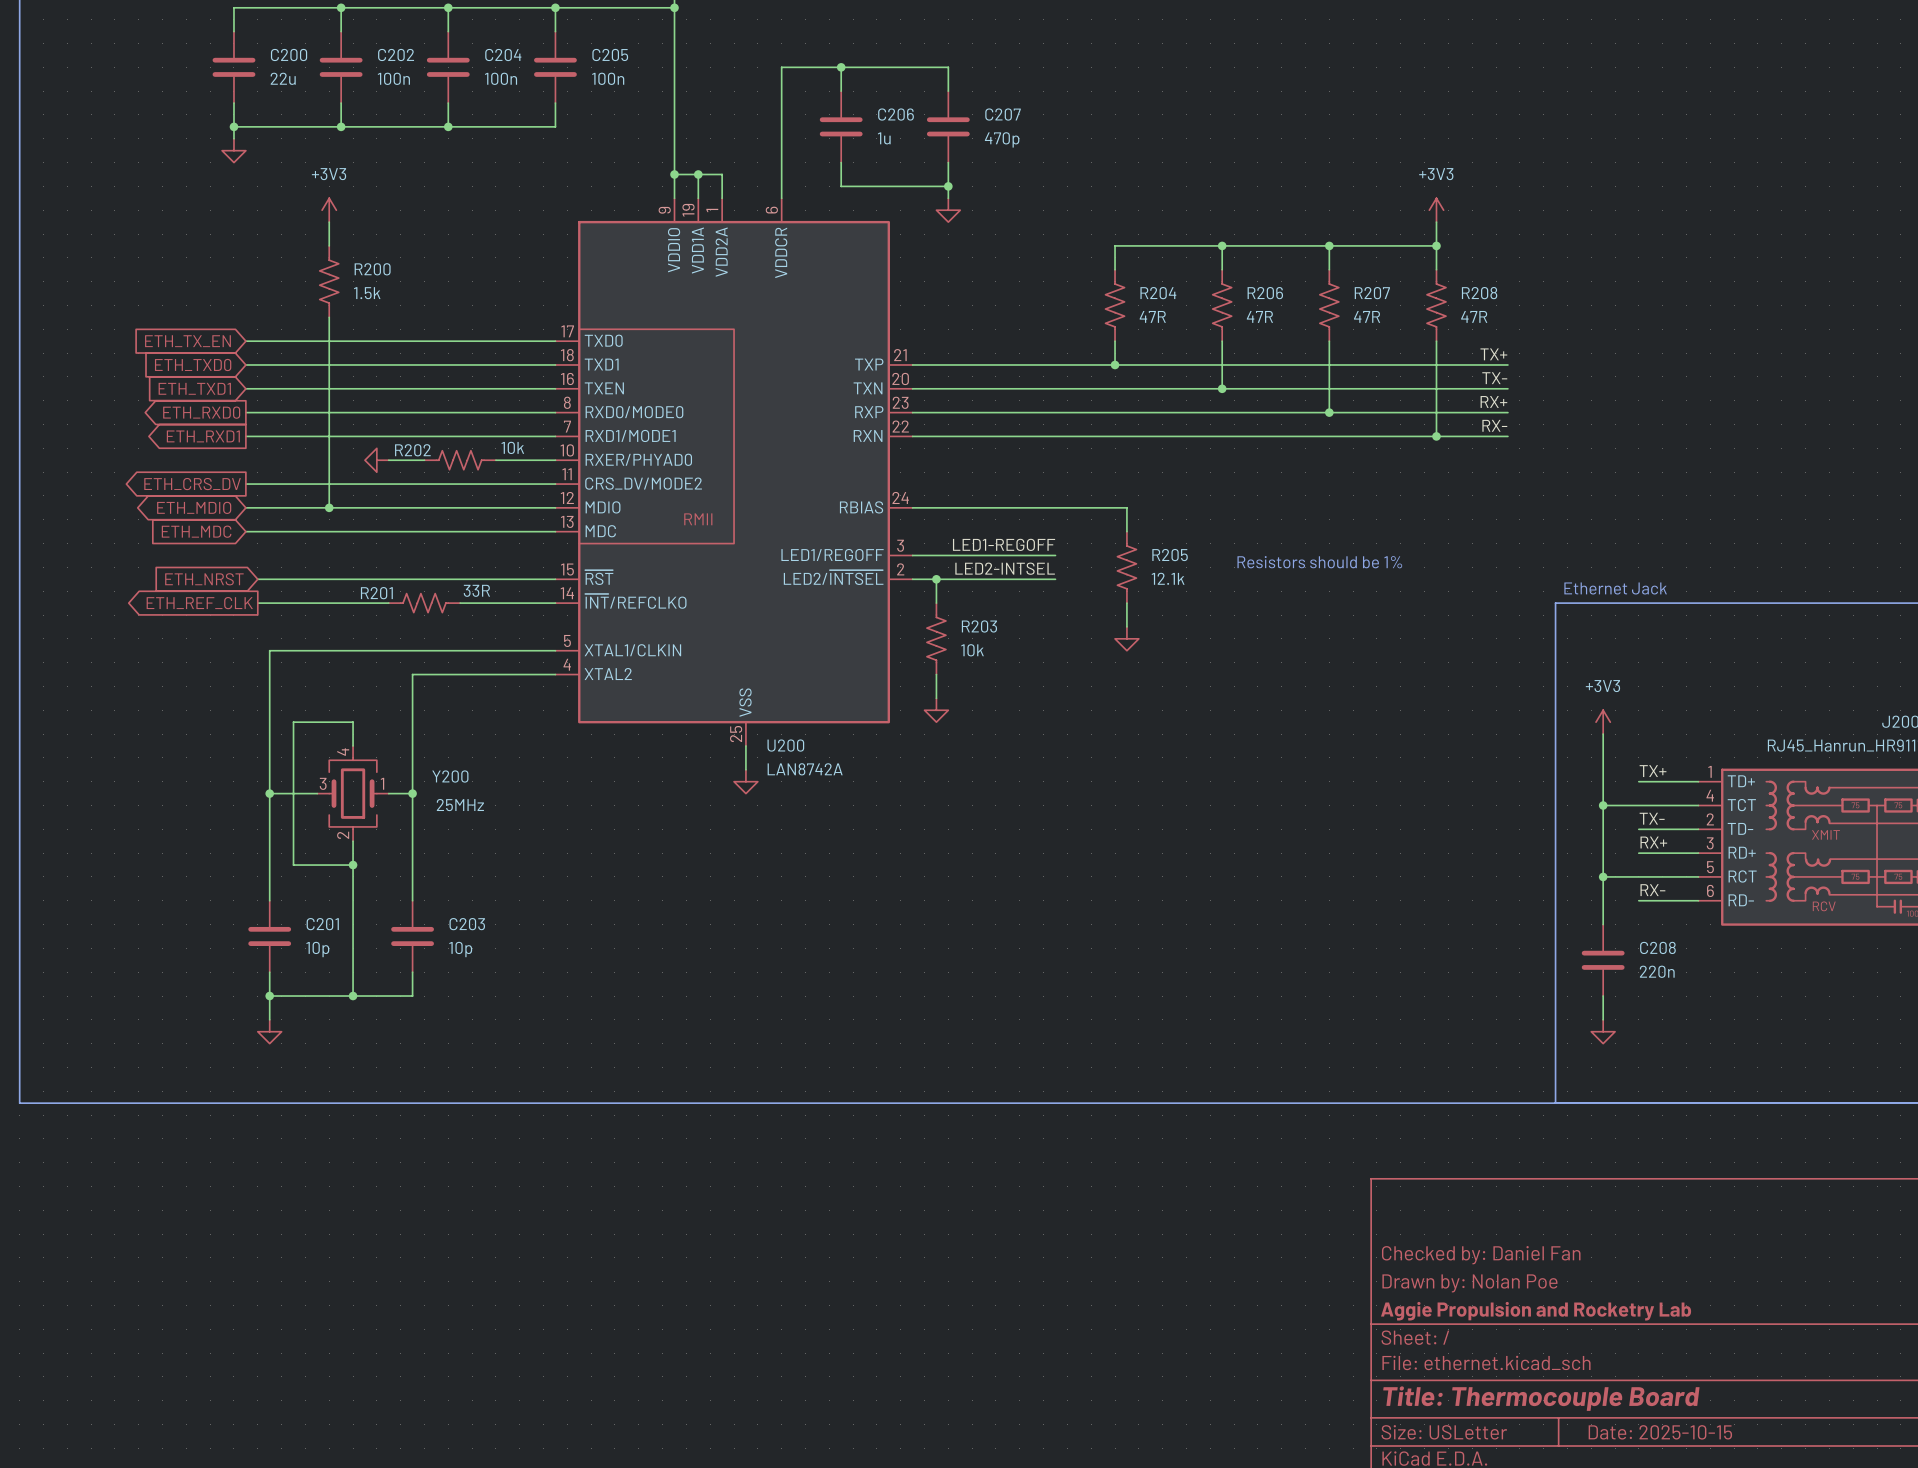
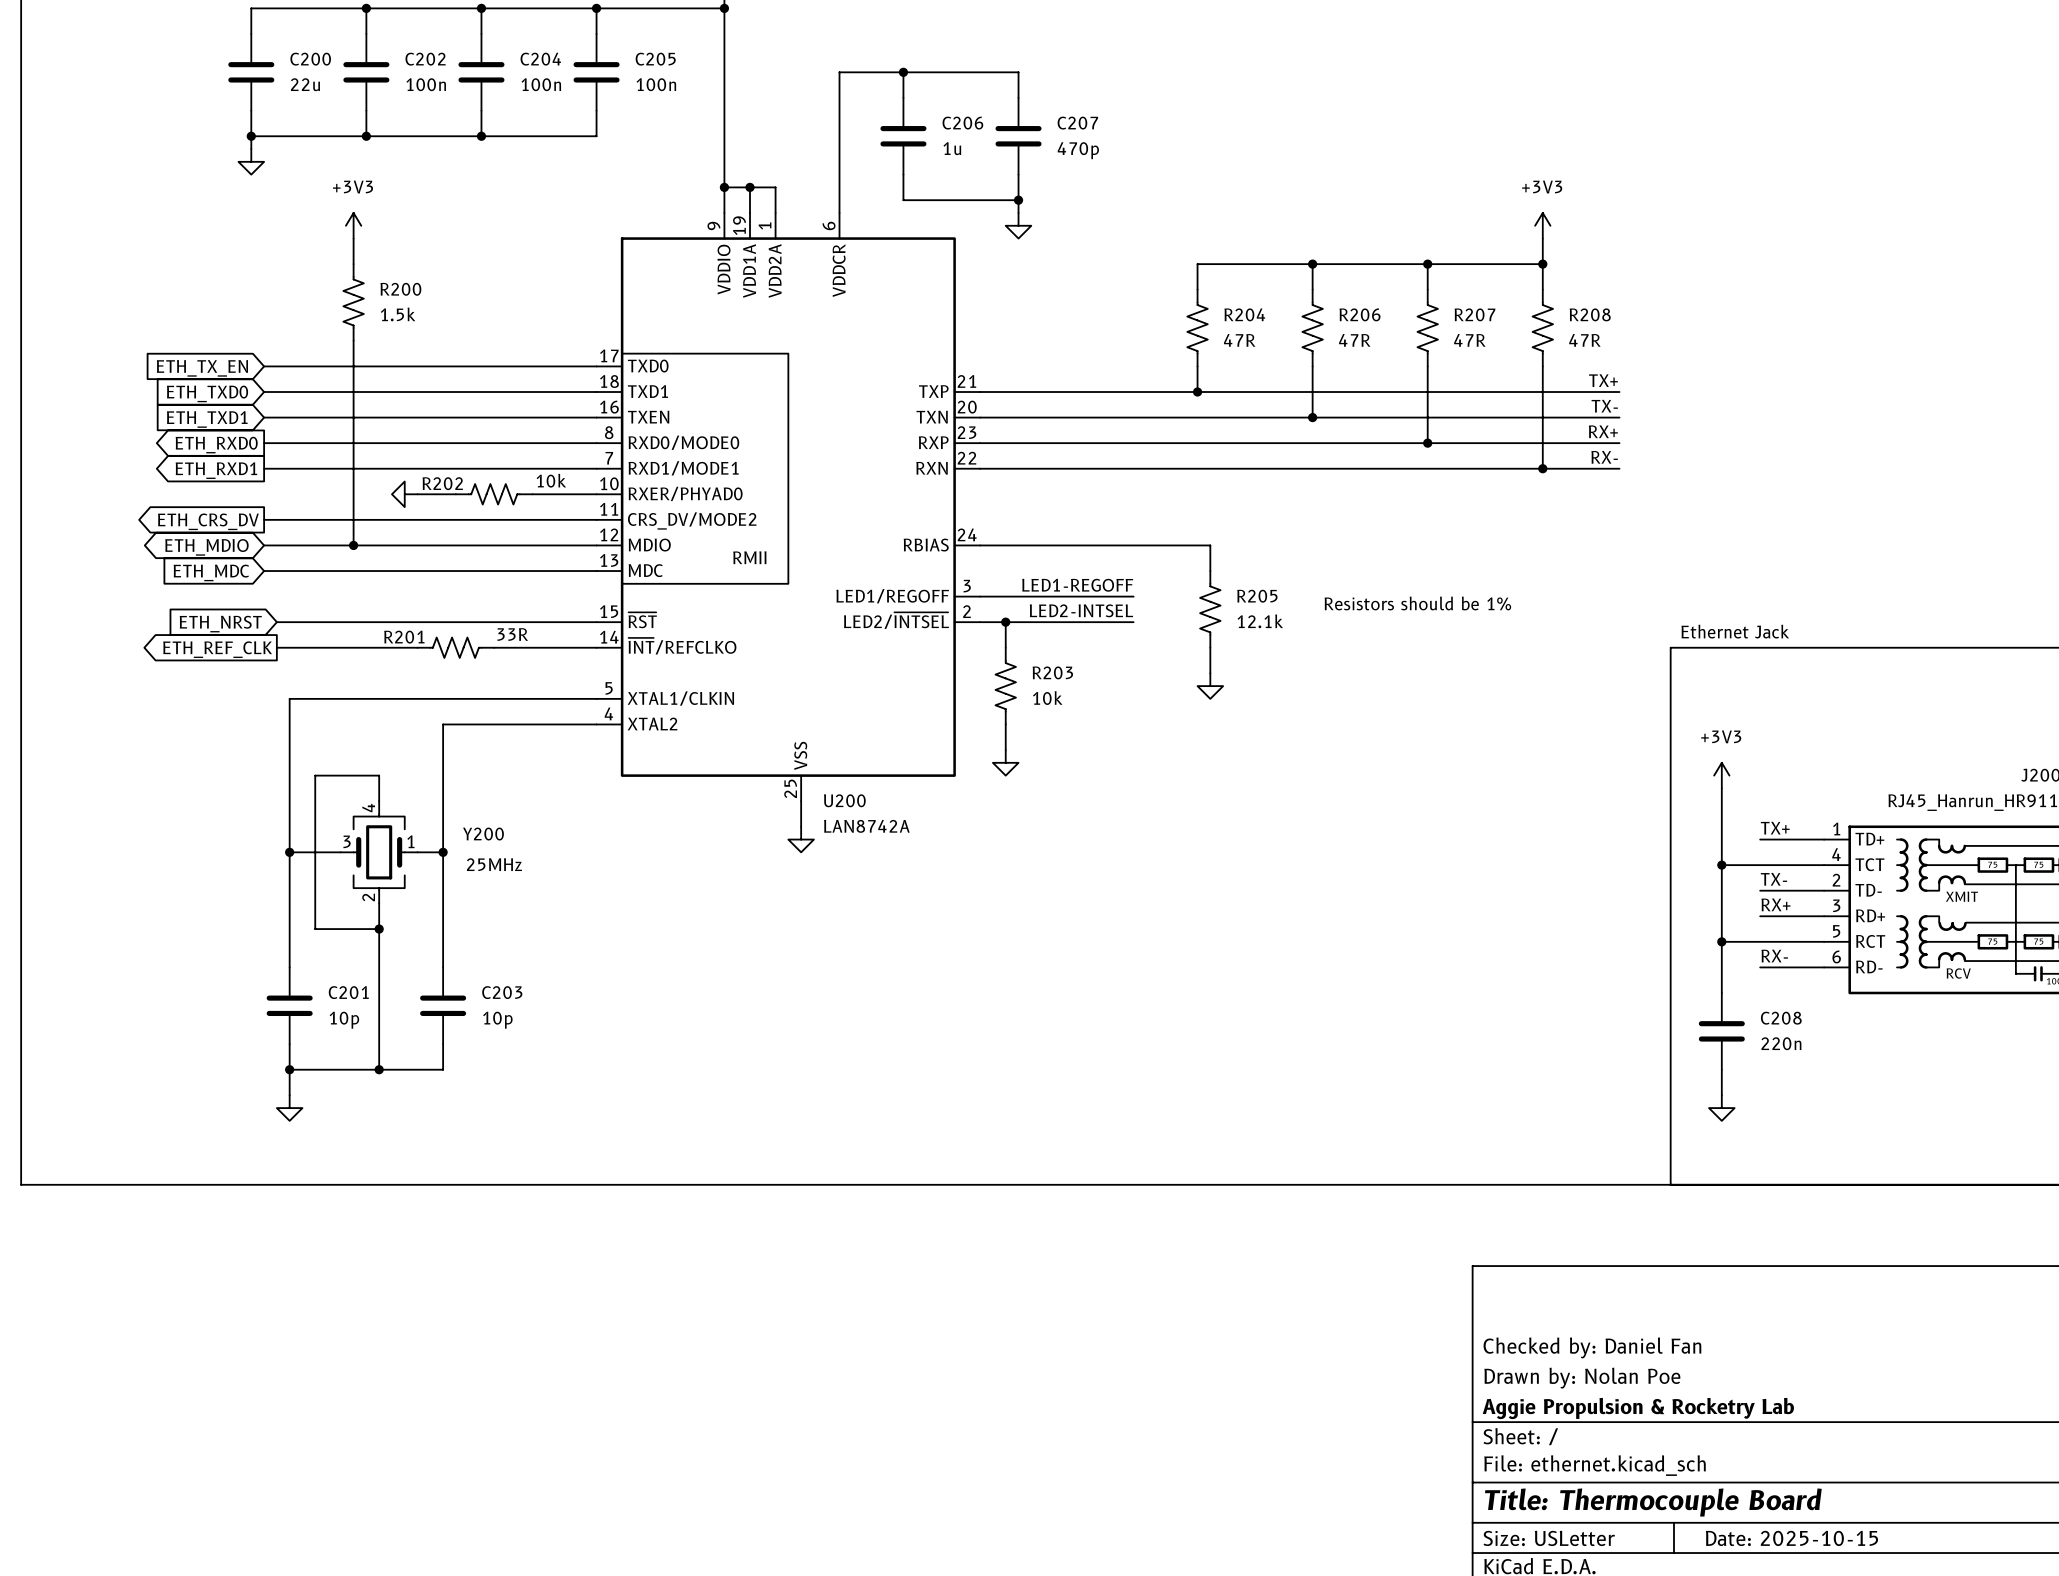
title block: Aggie Propulsion and Rocketry Lab (1536, 1311) -> Aggie Propulsion & Rocketry Lab (1638, 1408)

